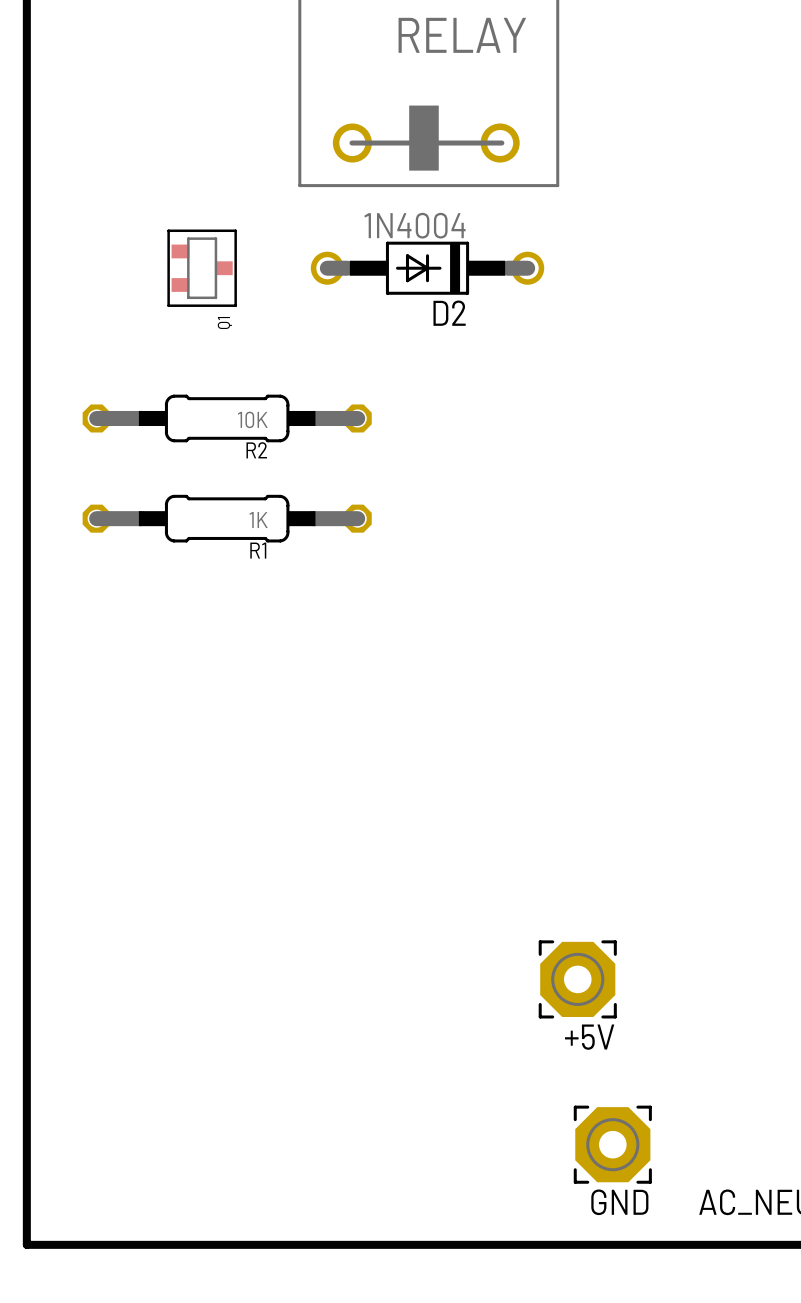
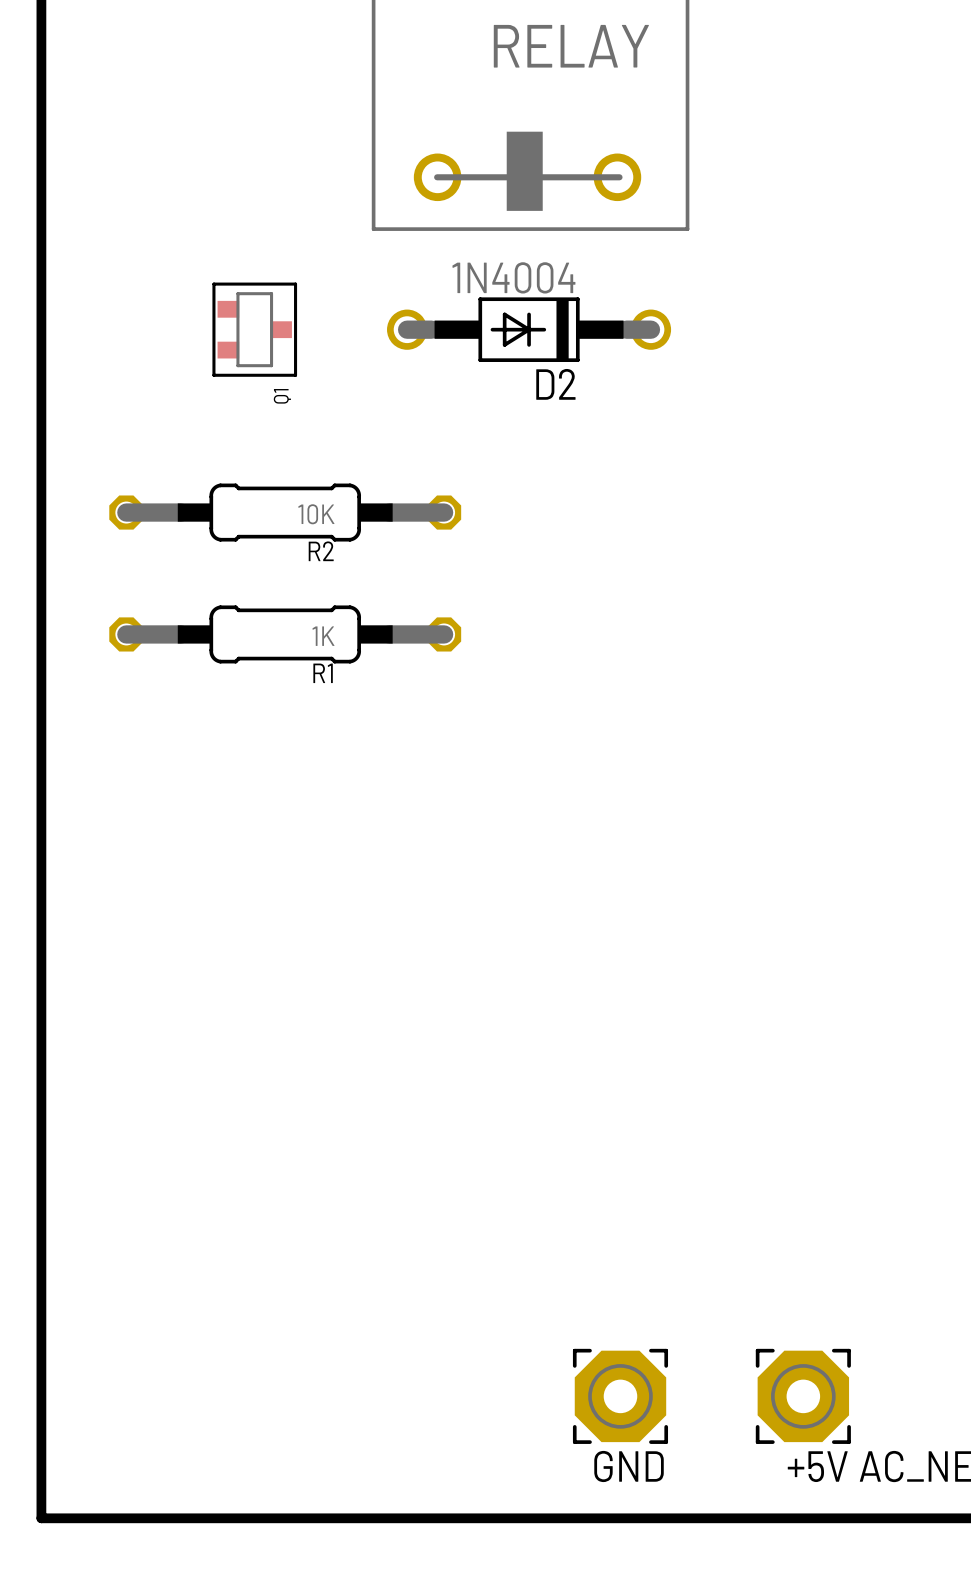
+5V position: (577, 979) -> (803, 1396)
GND position: (612, 1144) -> (620, 1396)

